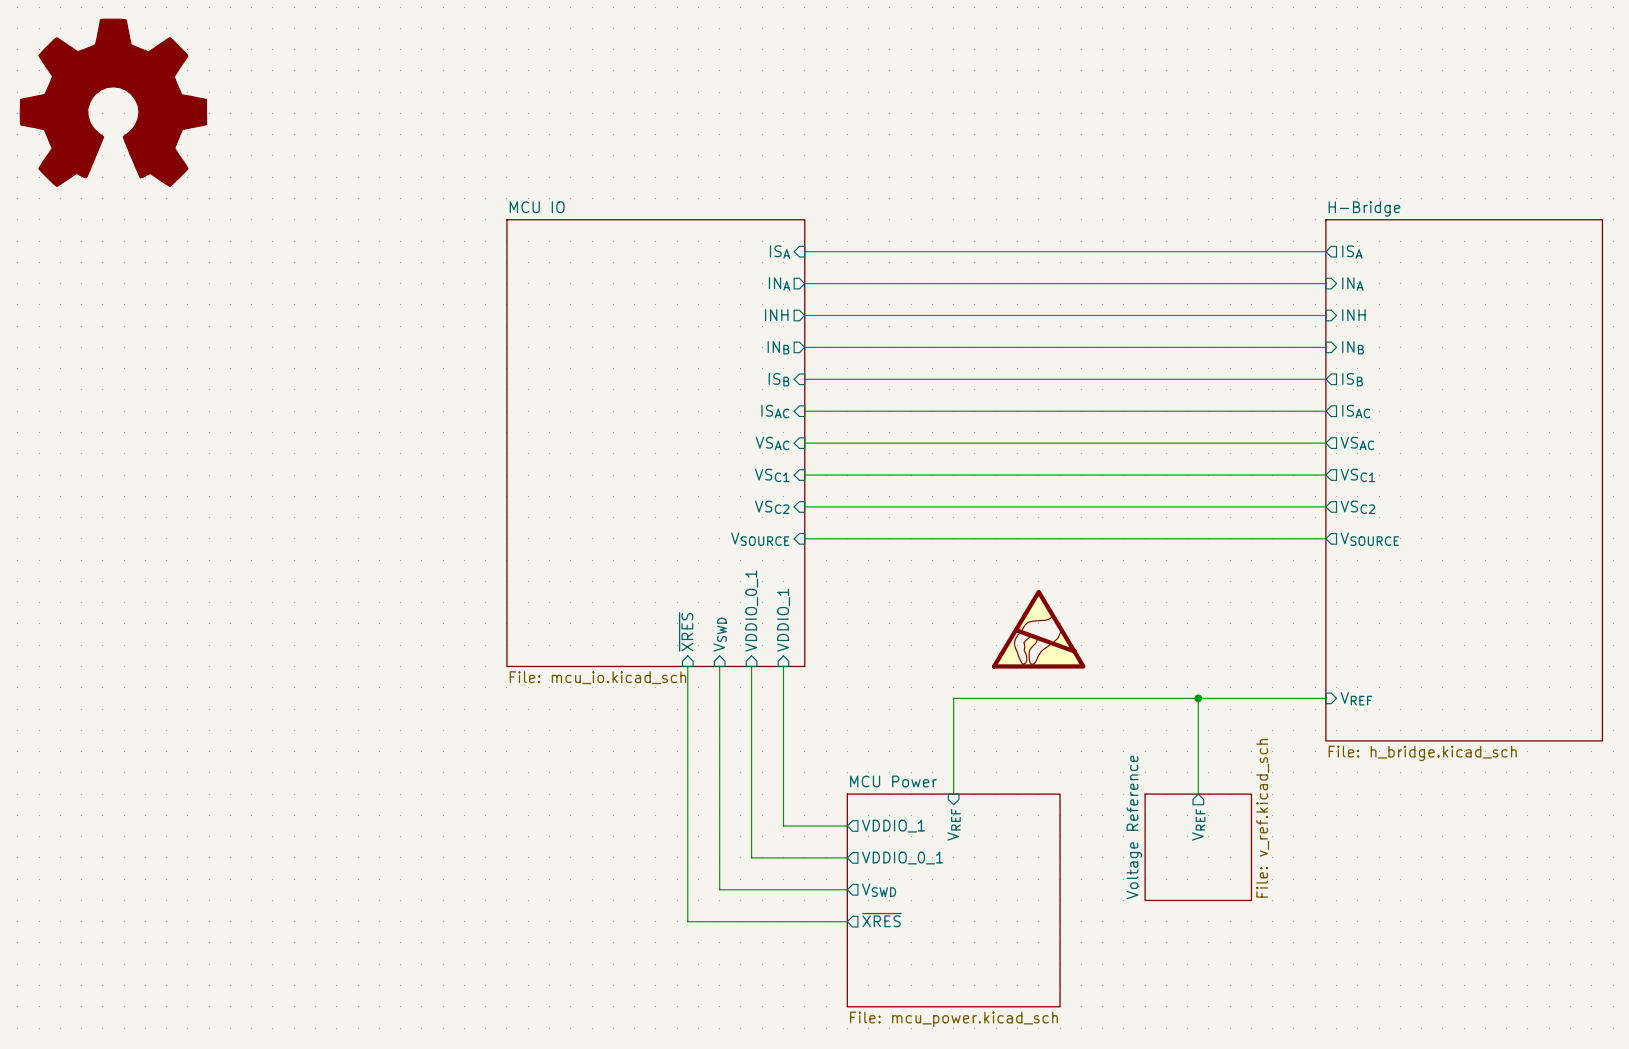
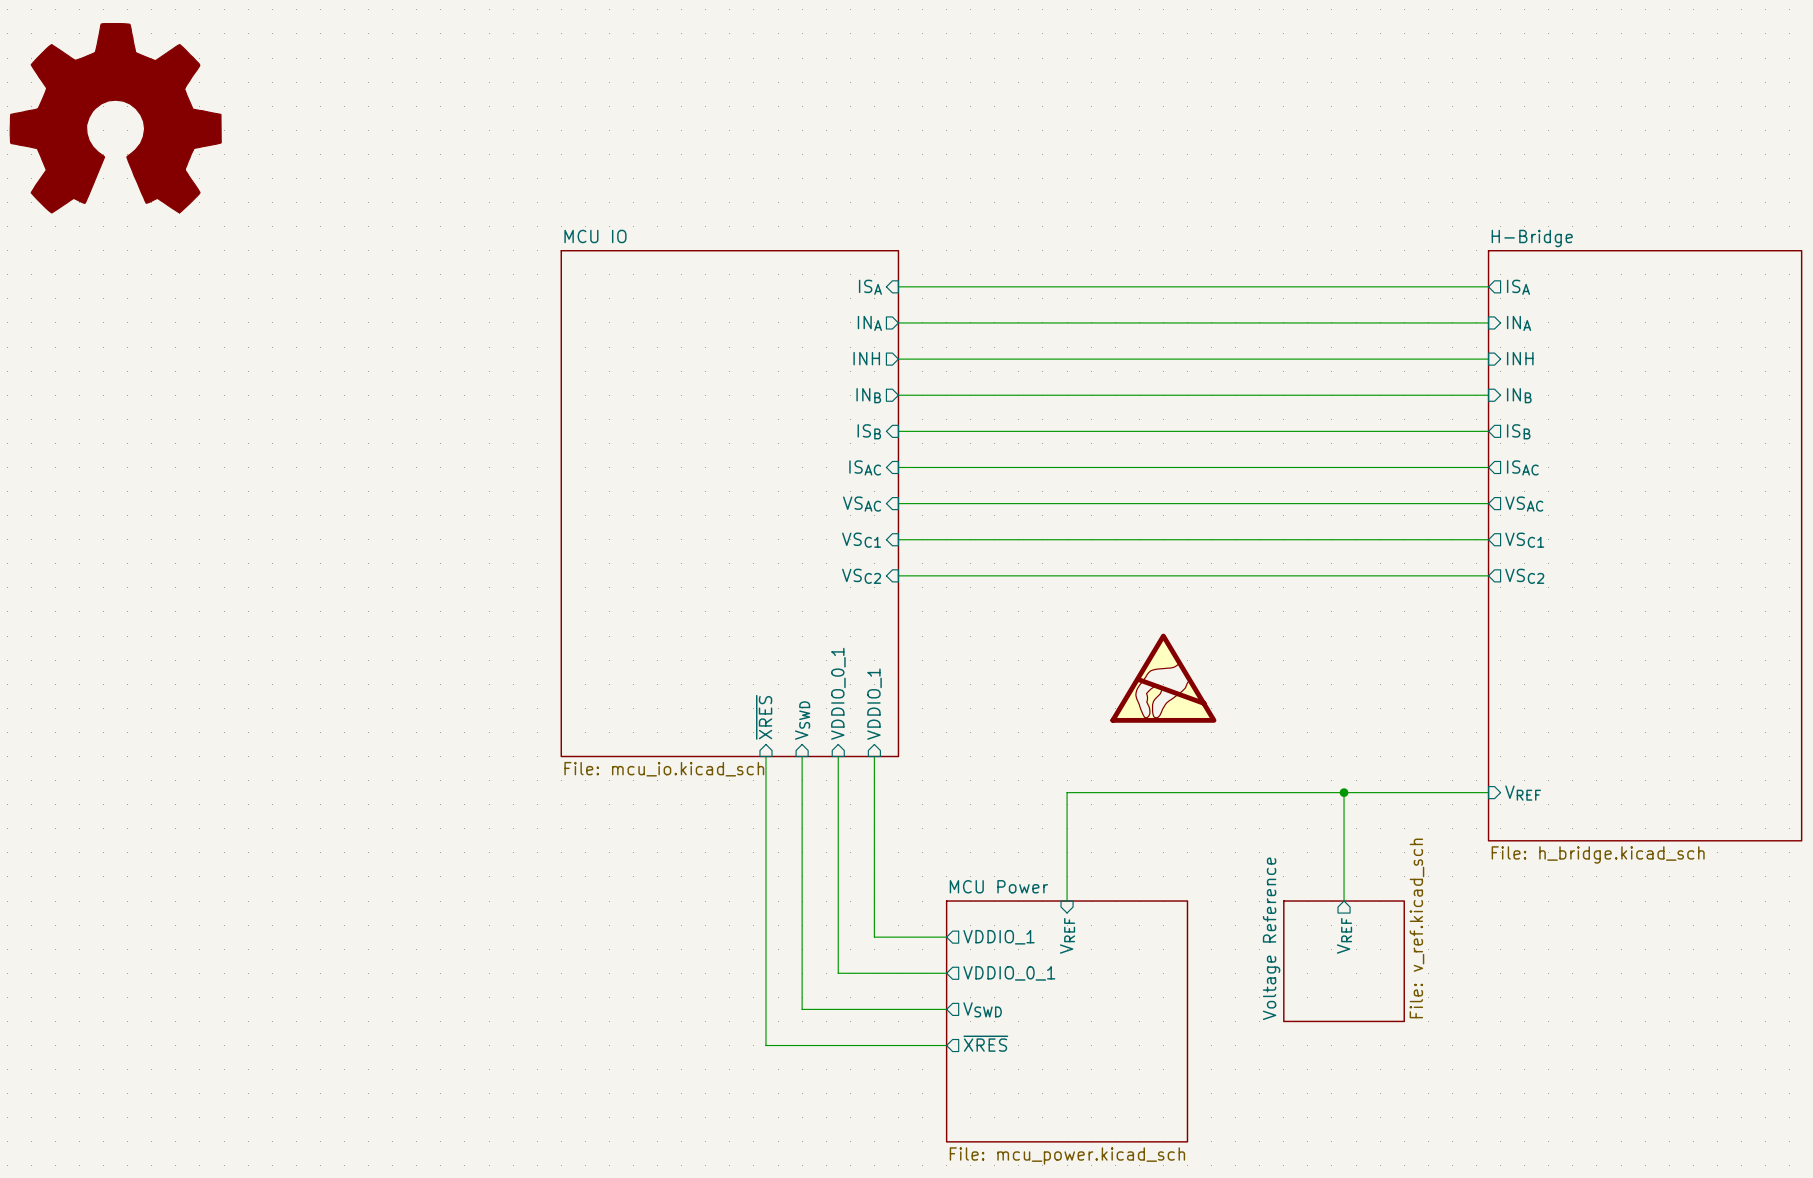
wire: (804, 538) (1325, 538) -> none
sheet pin: VSOURCE (760, 539) -> none
sheet pin: VSOURCE (1369, 539) -> none
power symbol position: (1038, 629) -> (1163, 678)

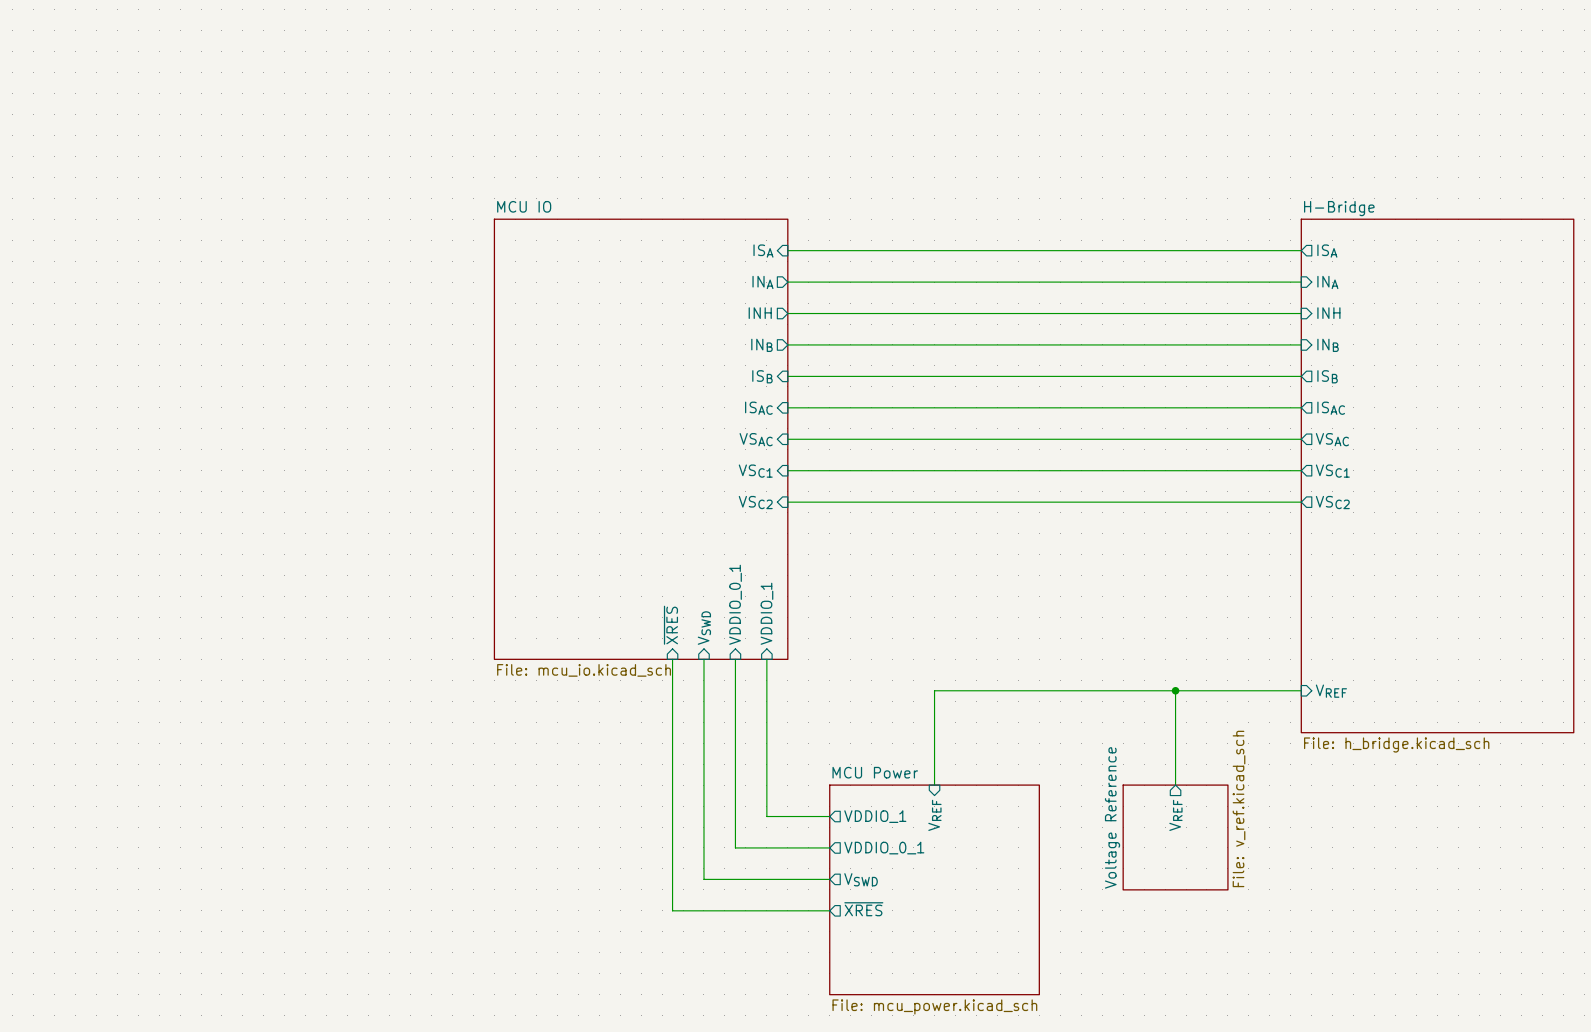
power symbol: (115, 118) -> none
power symbol: (1163, 678) -> none

